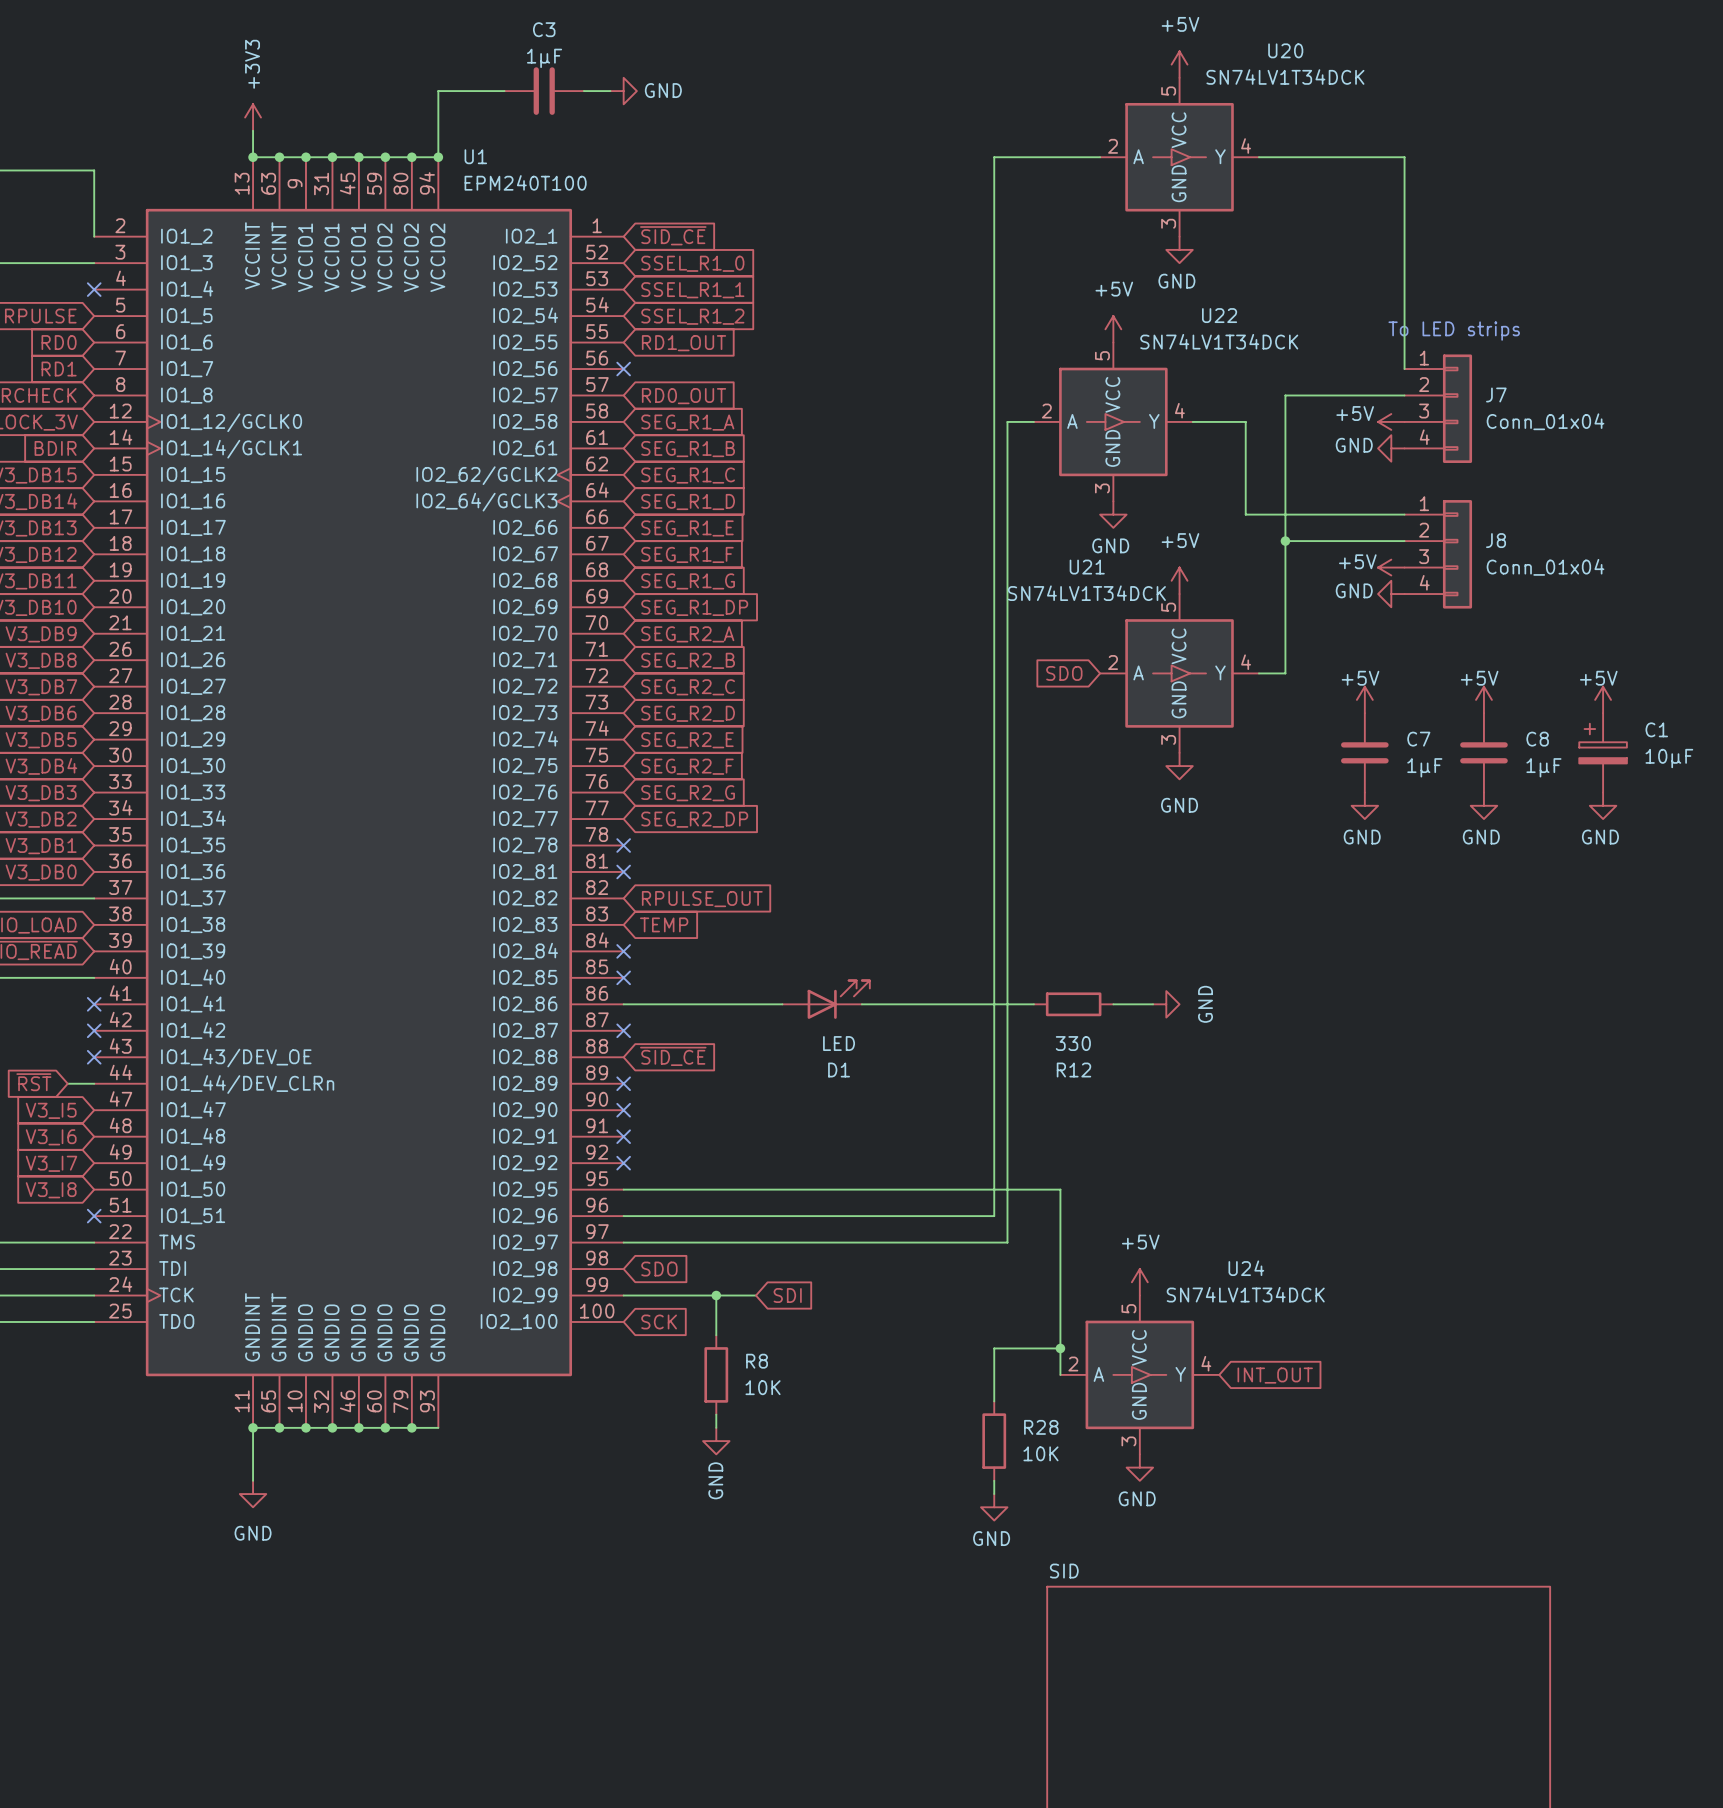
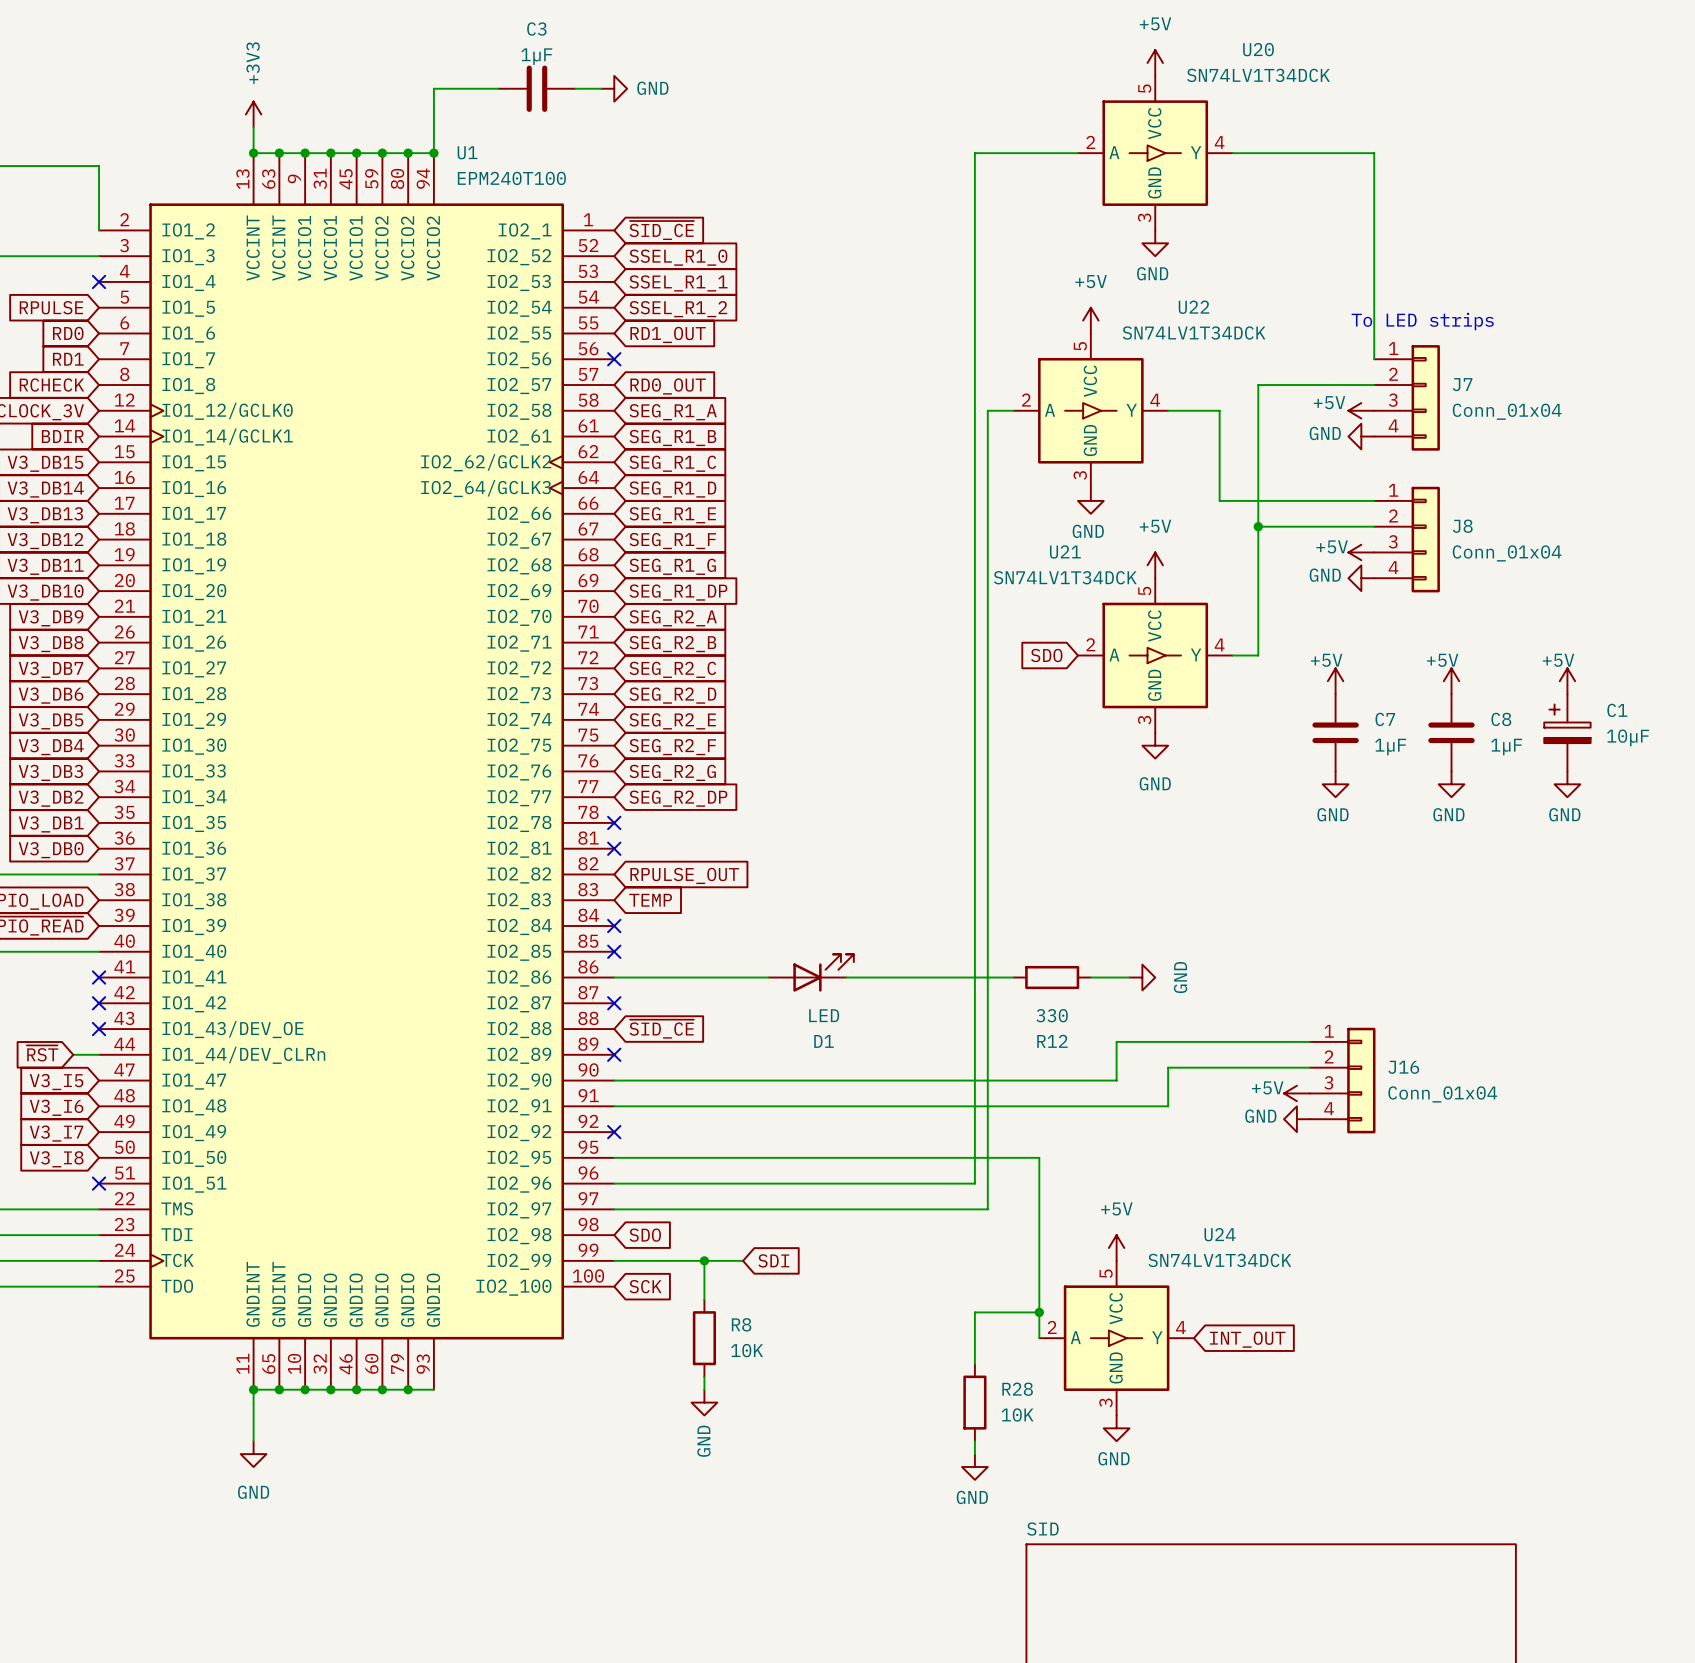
wire: none -> (1309, 1041) (1116, 1041) (1116, 1080) (614, 1080)
wire: none -> (1309, 1067) (1168, 1067) (1168, 1106) (614, 1106)
no-connect mark: (623, 1110) -> none
J16: none -> Conn_01x04 (1342, 1080)
power symbol: none -> +5V (1296, 1093)
no-connect mark: (623, 1136) -> none
power symbol: none -> GND (1296, 1119)

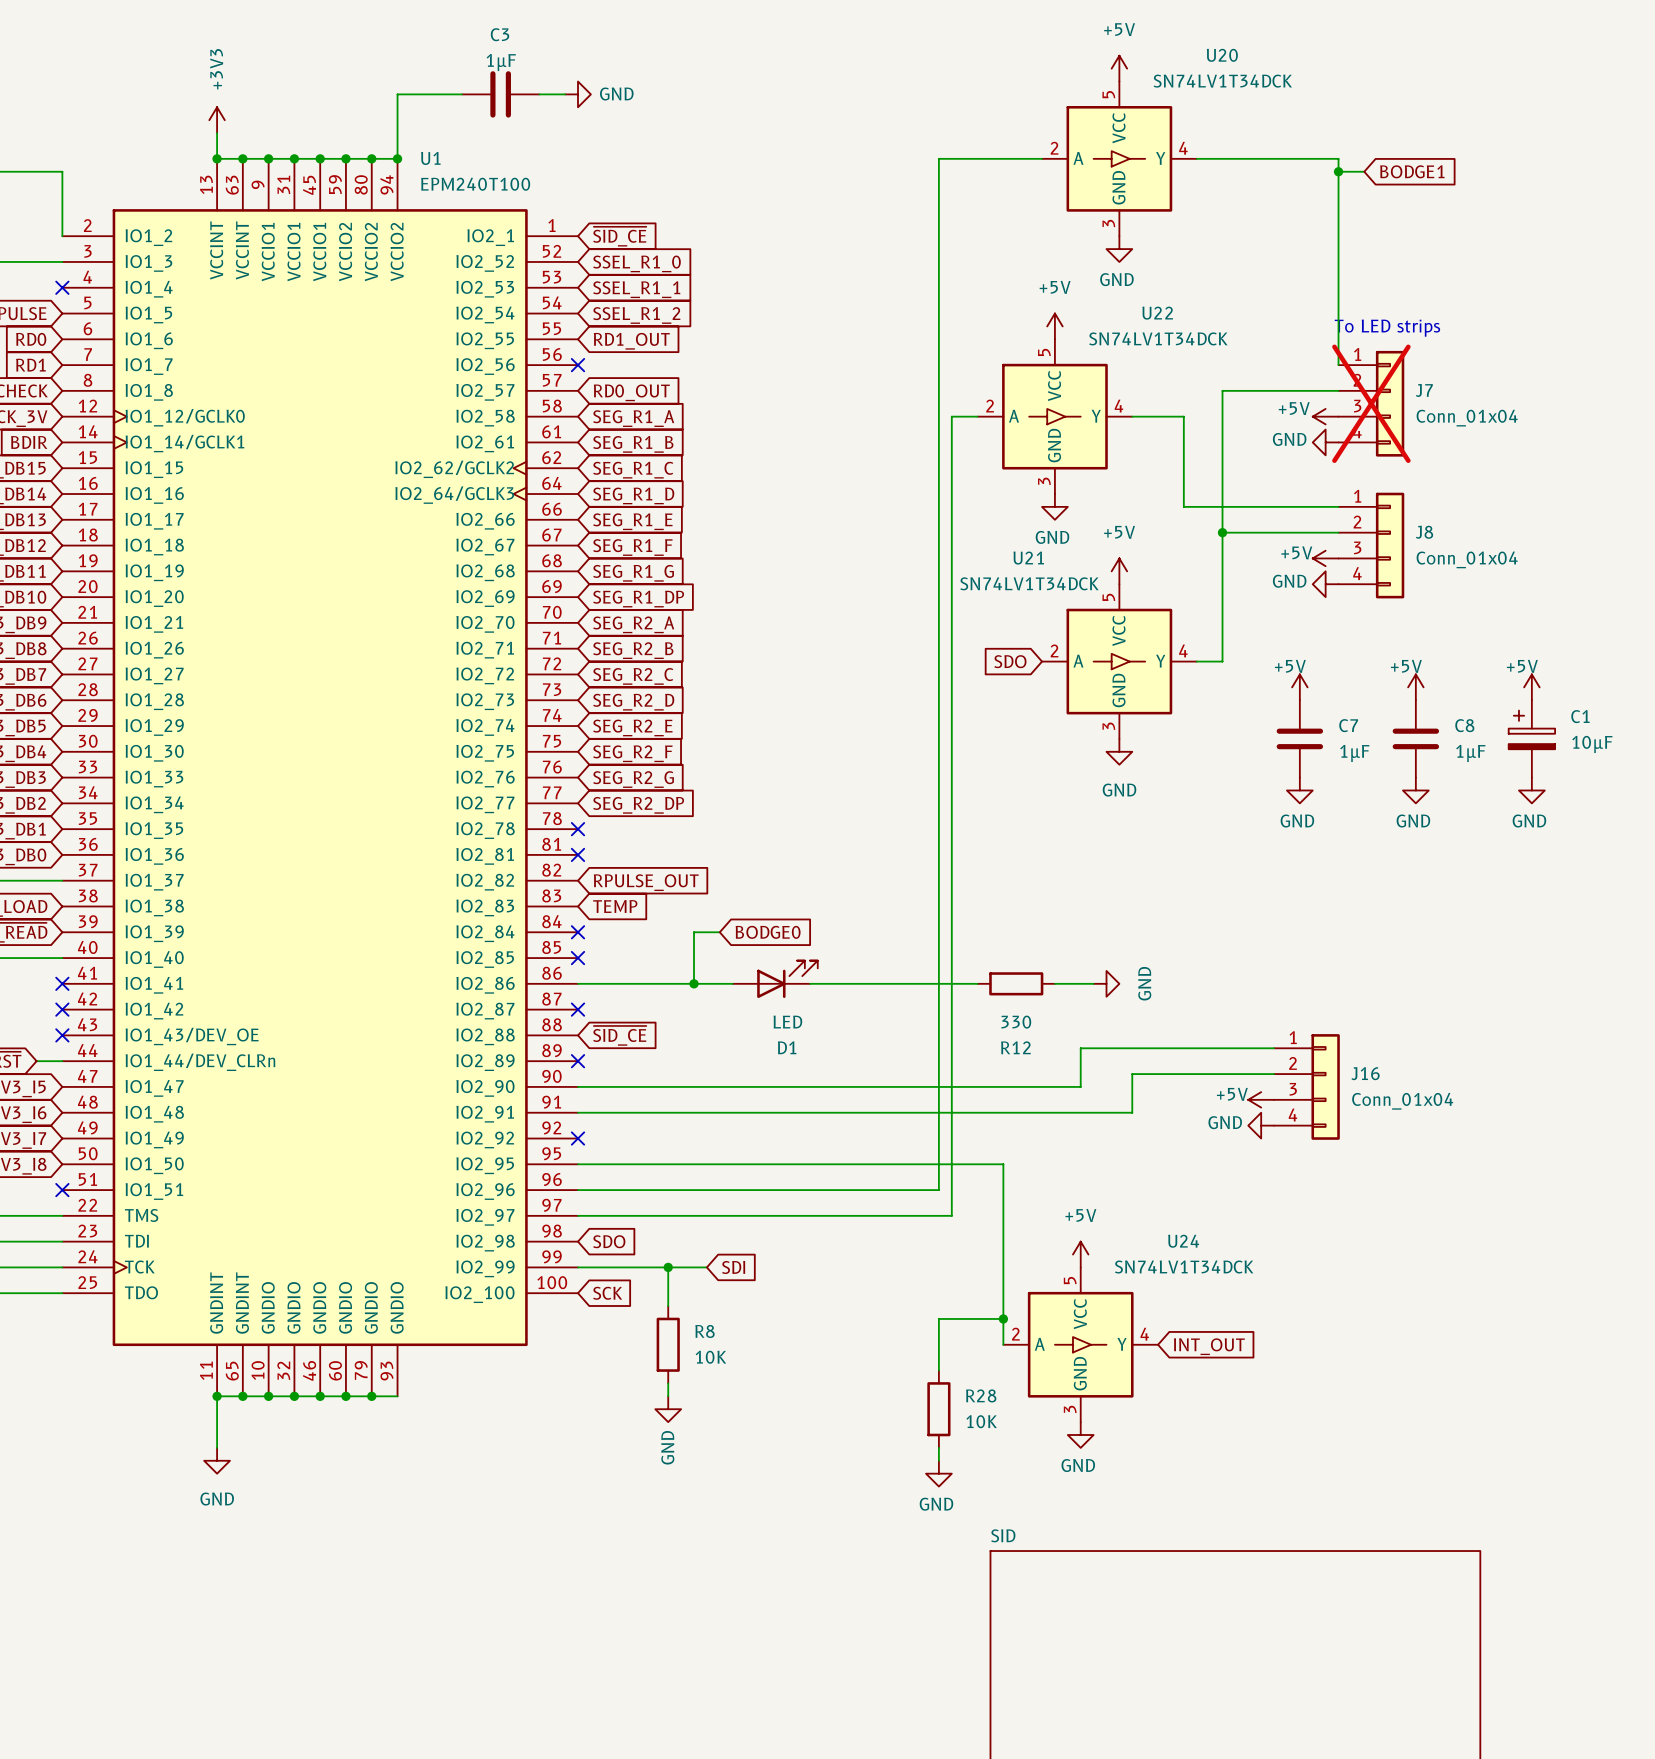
wire: none -> (1338, 171) (1364, 171)
junction: none -> (1338, 171)
global label: none -> BODGE1 (1412, 171)
J7 do-not-place cross: none -> (1371, 403)
wire: none -> (719, 932) (694, 932) (694, 983)
global label: none -> BODGE0 (768, 932)
junction: none -> (694, 983)

